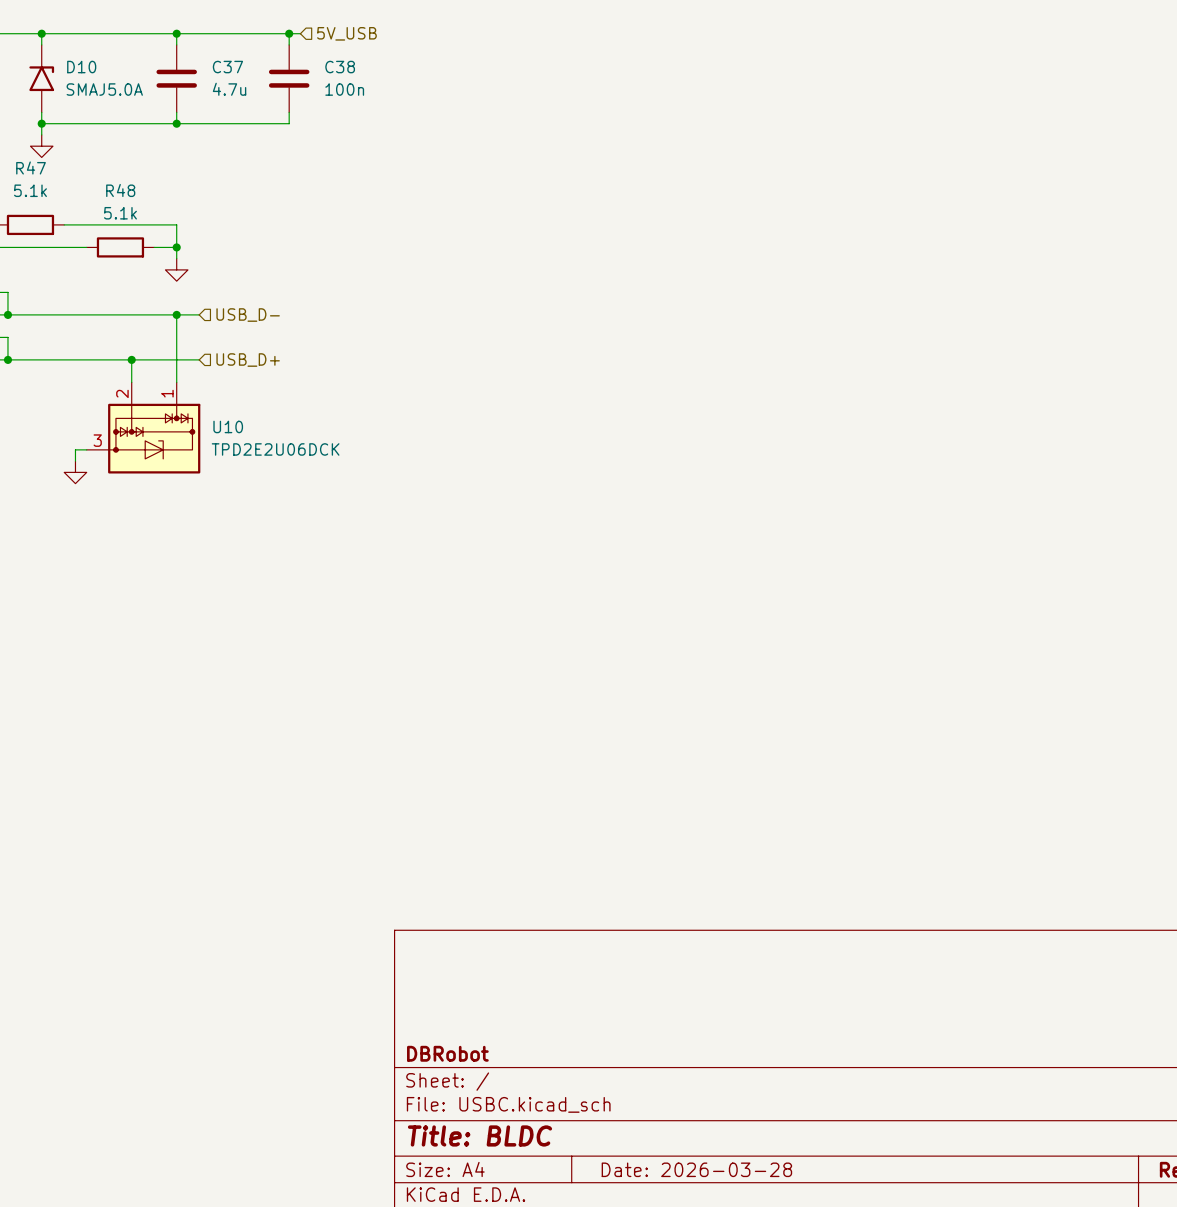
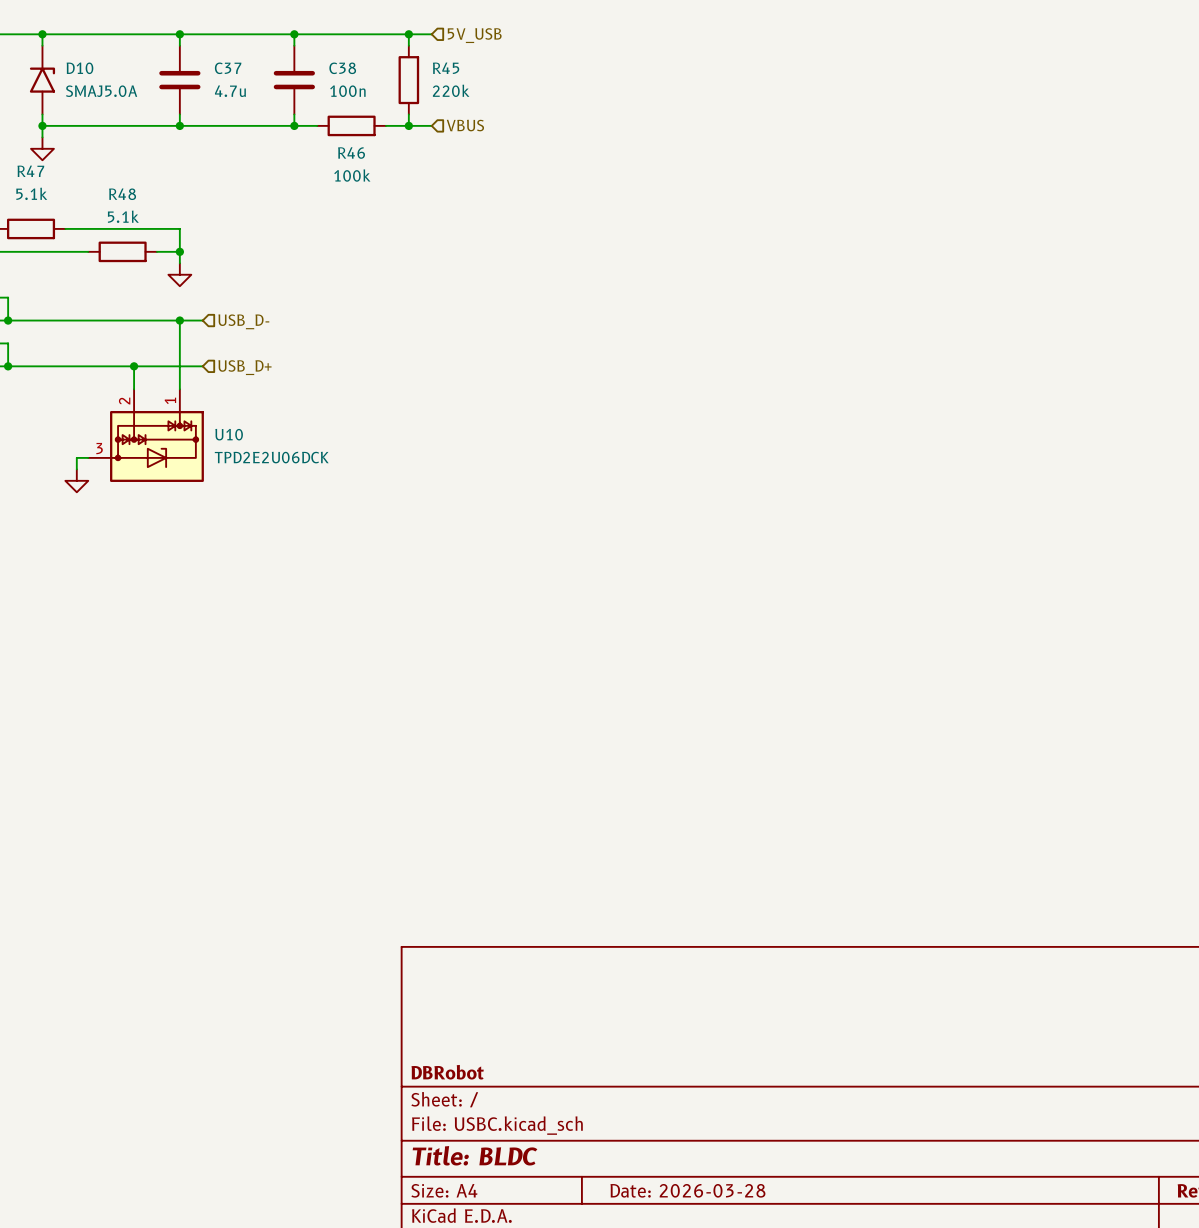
wire: none -> (305, 34) (431, 34)
hierarchical label position: 5V_USB (346, 33) -> 5V_USB (474, 35)
wire: none -> (408, 34) (408, 45)
junction: none -> (408, 34)
R45: none -> 220k (408, 80)
wire: none -> (408, 114) (408, 125)
wire: none -> (294, 125) (317, 125)
junction: none -> (294, 125)
R46: none -> 100k (351, 125)
wire: none -> (385, 125) (431, 125)
junction: none -> (408, 125)
hierarchical label: none -> VBUS (465, 125)

